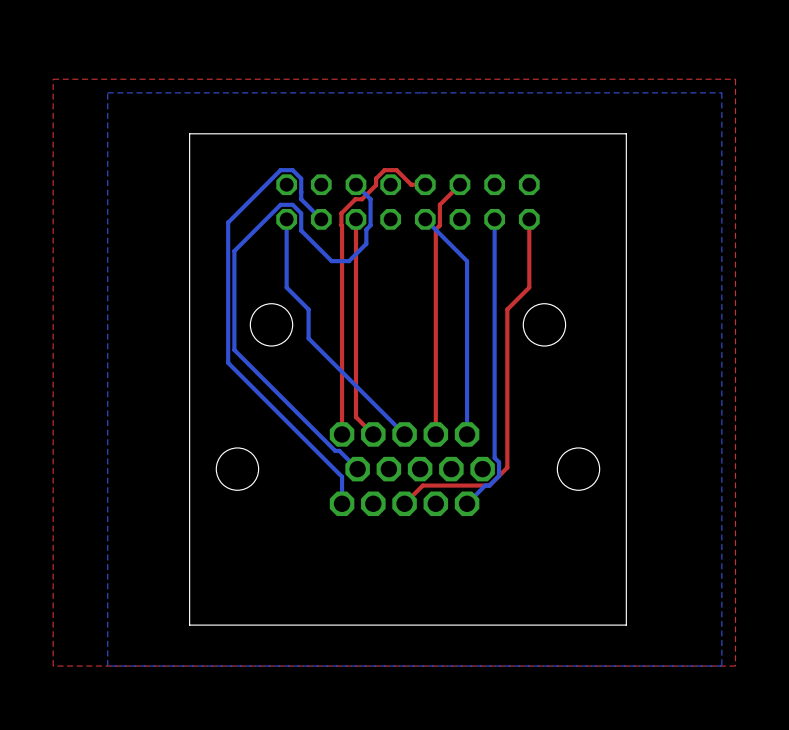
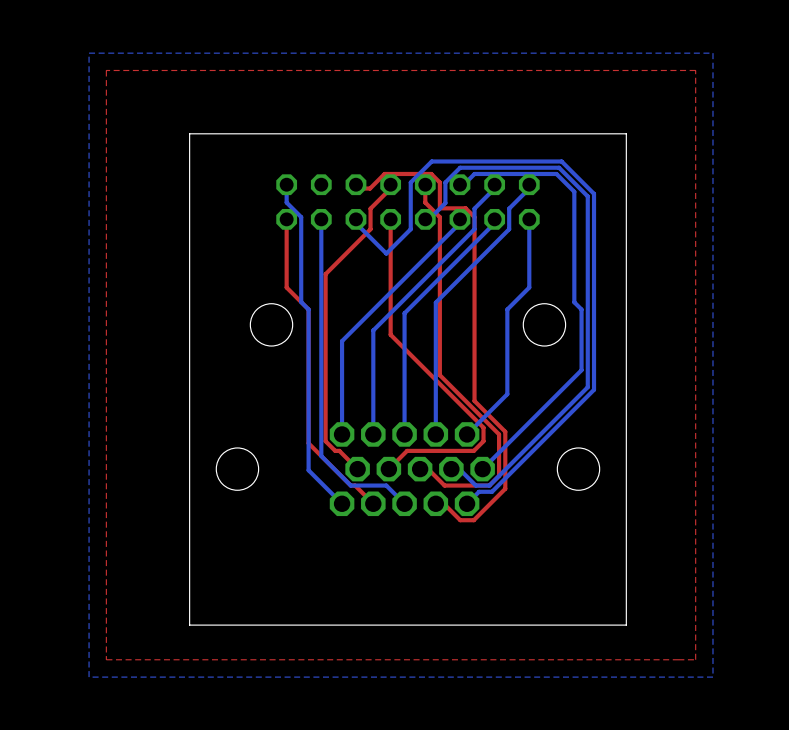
top zone outline: (735, 79) (53, 79) (53, 666) (735, 666) (735, 79) -> (695, 70) (695, 659) (106, 659) (106, 70) (695, 70)
bottom zone outline: (721, 92) (107, 92) (107, 666) (721, 666) (721, 92) -> (712, 53) (712, 677) (89, 677) (89, 53) (712, 53)
bottom track: (355, 184) (370, 199) (370, 225) (366, 229) (366, 243) (349, 261) (331, 261) (301, 230) -> none
top track: (425, 184) (411, 184) (396, 170) (384, 170) (376, 178) (376, 185) (362, 199) (355, 199) (341, 213) (342, 434) -> none
top track: (459, 184) (439, 204) -> (355, 188) (370, 188) (384, 173) (431, 173) (439, 182) (439, 204)
top track: none -> (390, 188) (370, 208) (370, 229) (325, 274) (325, 441) (335, 450) (339, 450) (357, 469)
bottom track: none -> (459, 188) (474, 173) (556, 173) (574, 191) (574, 302) (581, 309) (581, 370) (482, 469)
bottom track: none -> (494, 188) (474, 208) (474, 229) (373, 330) (373, 434)
bottom track: none -> (529, 188) (509, 208) (509, 229) (435, 302) (435, 434)
top track: (439, 208) (439, 217) -> (425, 188) (425, 202) (439, 217)
top track: none -> (439, 208) (465, 208) (474, 217) (474, 401) (505, 431) (505, 488) (473, 520) (460, 520) (443, 503) (435, 503)
bottom track: (301, 217) (301, 213) (292, 204) (280, 204) (234, 251) (234, 350) (335, 450) (339, 450) (357, 469) -> (301, 217) (286, 202) (286, 188)
bottom track: (286, 219) (286, 287) (301, 302) -> (301, 230) (301, 302)
bottom track: (321, 219) (301, 199) (301, 178) (292, 170) (280, 170) (228, 222) (228, 362) (321, 456) -> (321, 223) (321, 456)
top track: (355, 219) (355, 417) (373, 434) -> none
bottom track: (425, 219) (467, 261) (467, 434) -> (529, 223) (529, 287) (507, 309) (507, 394) (467, 434)
bottom track: (494, 219) (494, 457) (499, 462) (499, 475) -> (425, 223) (445, 203) (445, 182) (460, 167) (559, 167) (587, 196) (587, 387) (499, 475)
top track: (529, 219) (529, 287) (507, 309) (507, 467) (499, 475) -> none
top track: none -> (286, 223) (286, 287) (308, 309) (308, 443) (350, 485) (355, 485) (373, 503)
bottom track: none -> (355, 223) (386, 253) (410, 229) (410, 182) (431, 161) (561, 161) (594, 193) (594, 389) (492, 491) (479, 491)
top track: none -> (390, 223) (390, 334) (483, 427) (483, 441) (473, 450) (407, 450) (388, 469)
bottom track: none -> (459, 223) (342, 341) (342, 434)
bottom track: none -> (494, 223) (404, 313) (404, 434)
top track: (439, 225) (435, 229) (435, 434) -> (439, 225) (439, 375) (499, 434) (499, 475)
bottom track: (308, 338) (404, 434) -> (308, 338) (308, 470) (342, 503)
bottom track: (342, 476) (342, 503) -> (342, 476) (350, 485) (386, 485) (404, 503)
top track: (444, 485) (422, 485) (404, 503) -> (444, 485) (428, 469) (420, 469)
bottom track: (485, 485) (479, 491) -> (485, 485) (475, 485) (459, 469) (451, 469)

